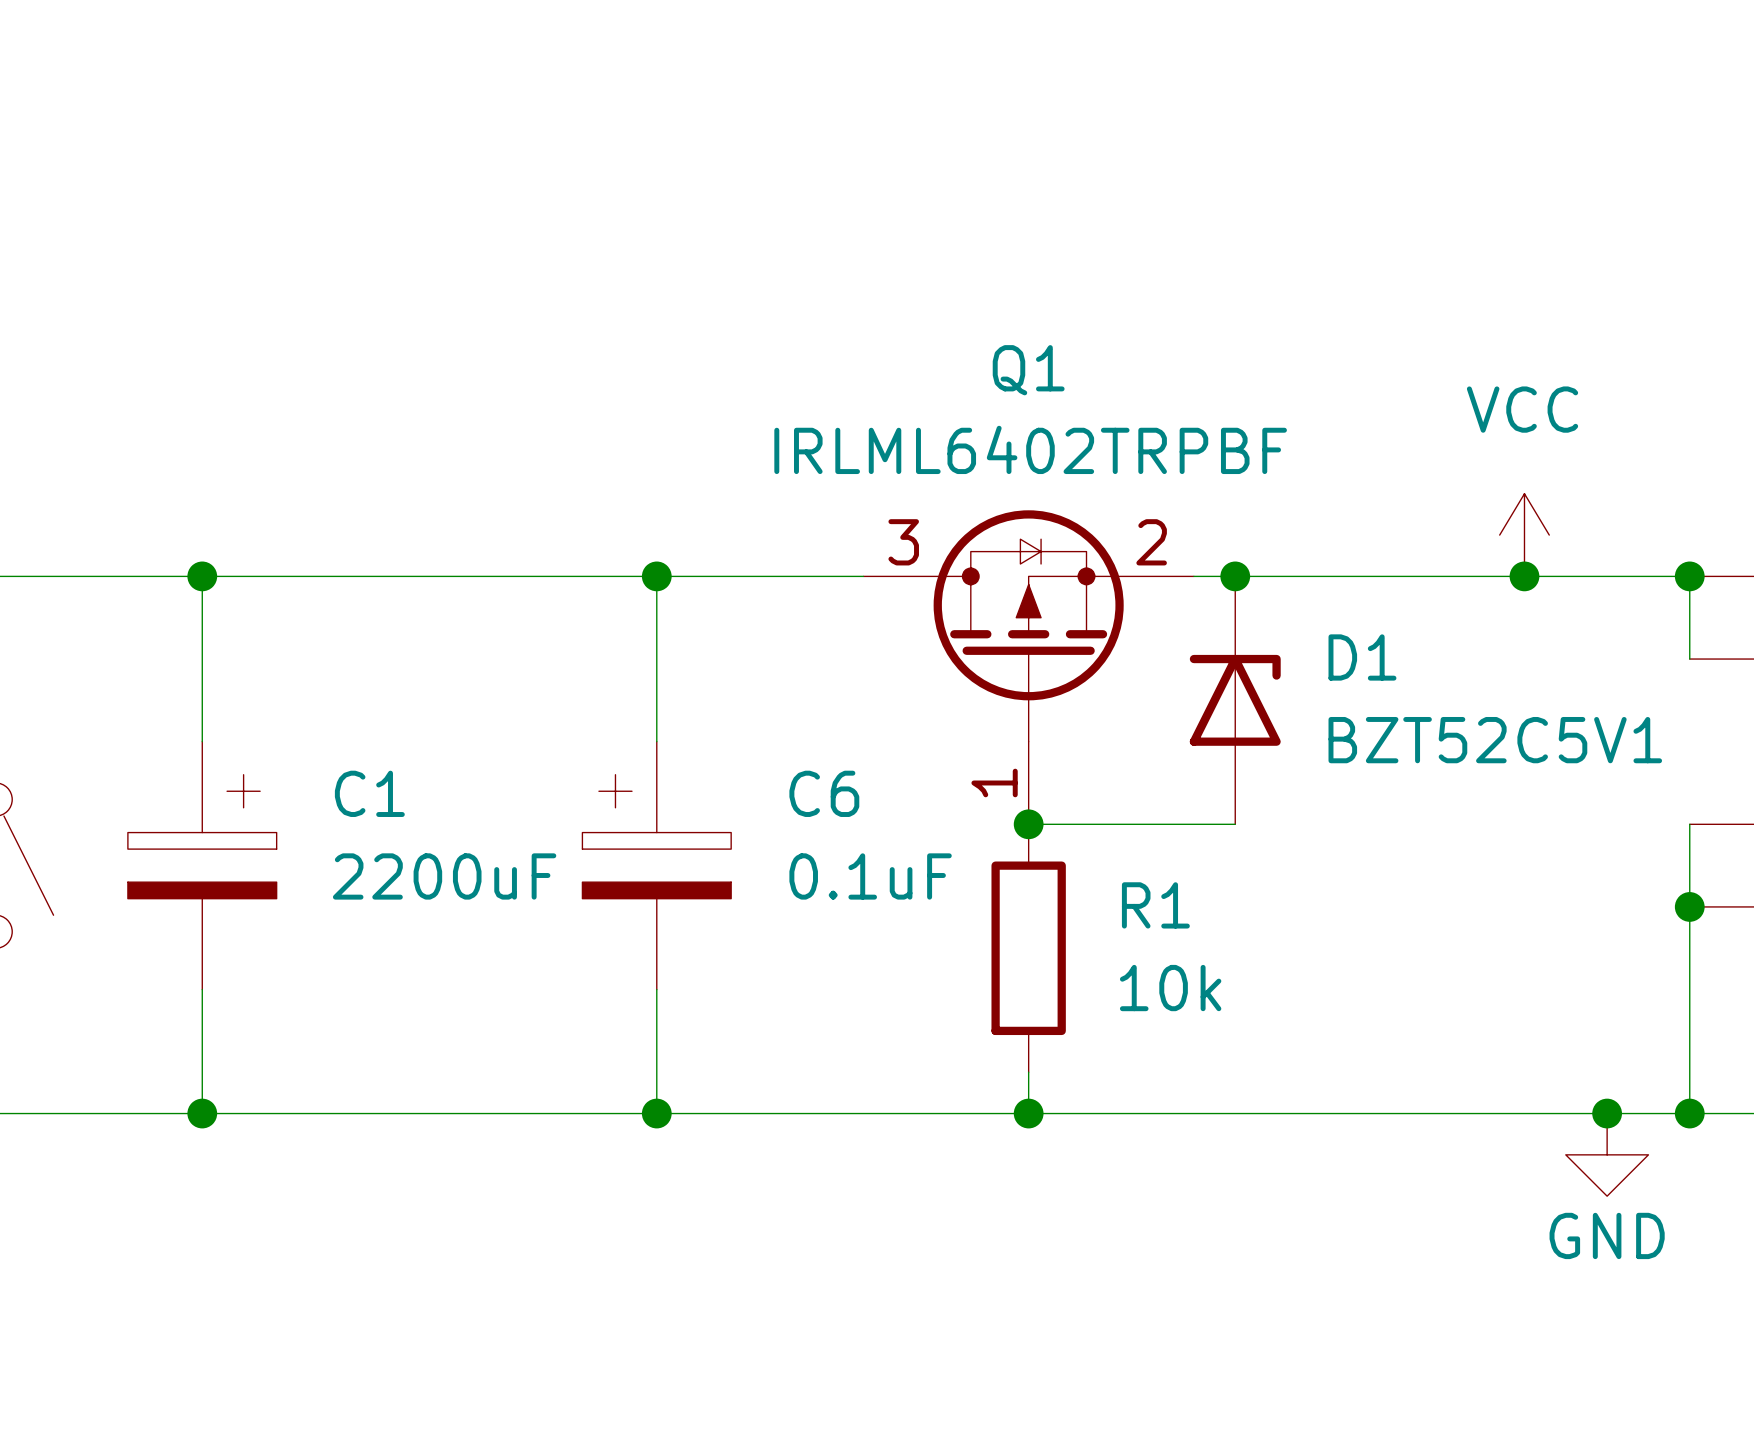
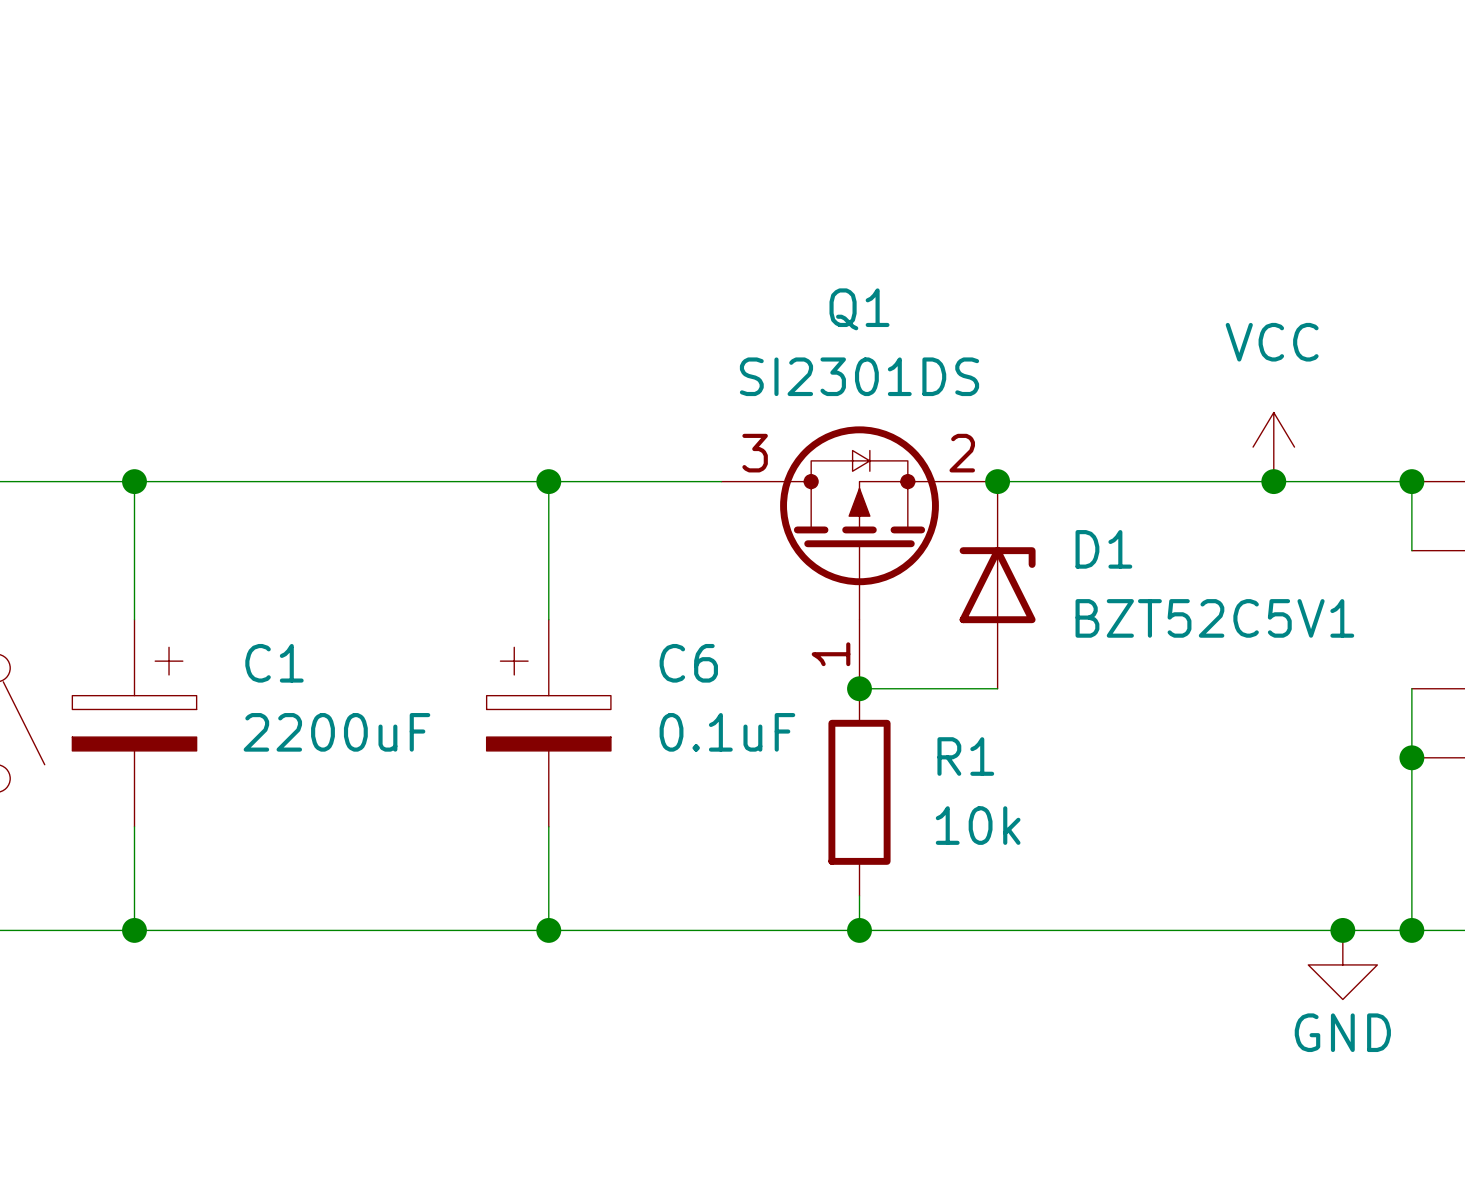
Q1 value: IRLML6402TRPBF (1030, 449) -> SI2301DS (859, 376)
wire: (202, 576) (202, 741) -> (134, 481) (134, 619)
junction position: (202, 576) -> (134, 481)
junction position: (1235, 576) -> (997, 481)
D1 position: (1235, 700) -> (997, 585)
wire: (1193, 824) (1235, 824) -> none
C1 position: (202, 865) -> (134, 723)
wire: (202, 989) (202, 1113) -> (134, 826) (134, 930)
junction position: (202, 1113) -> (134, 930)

